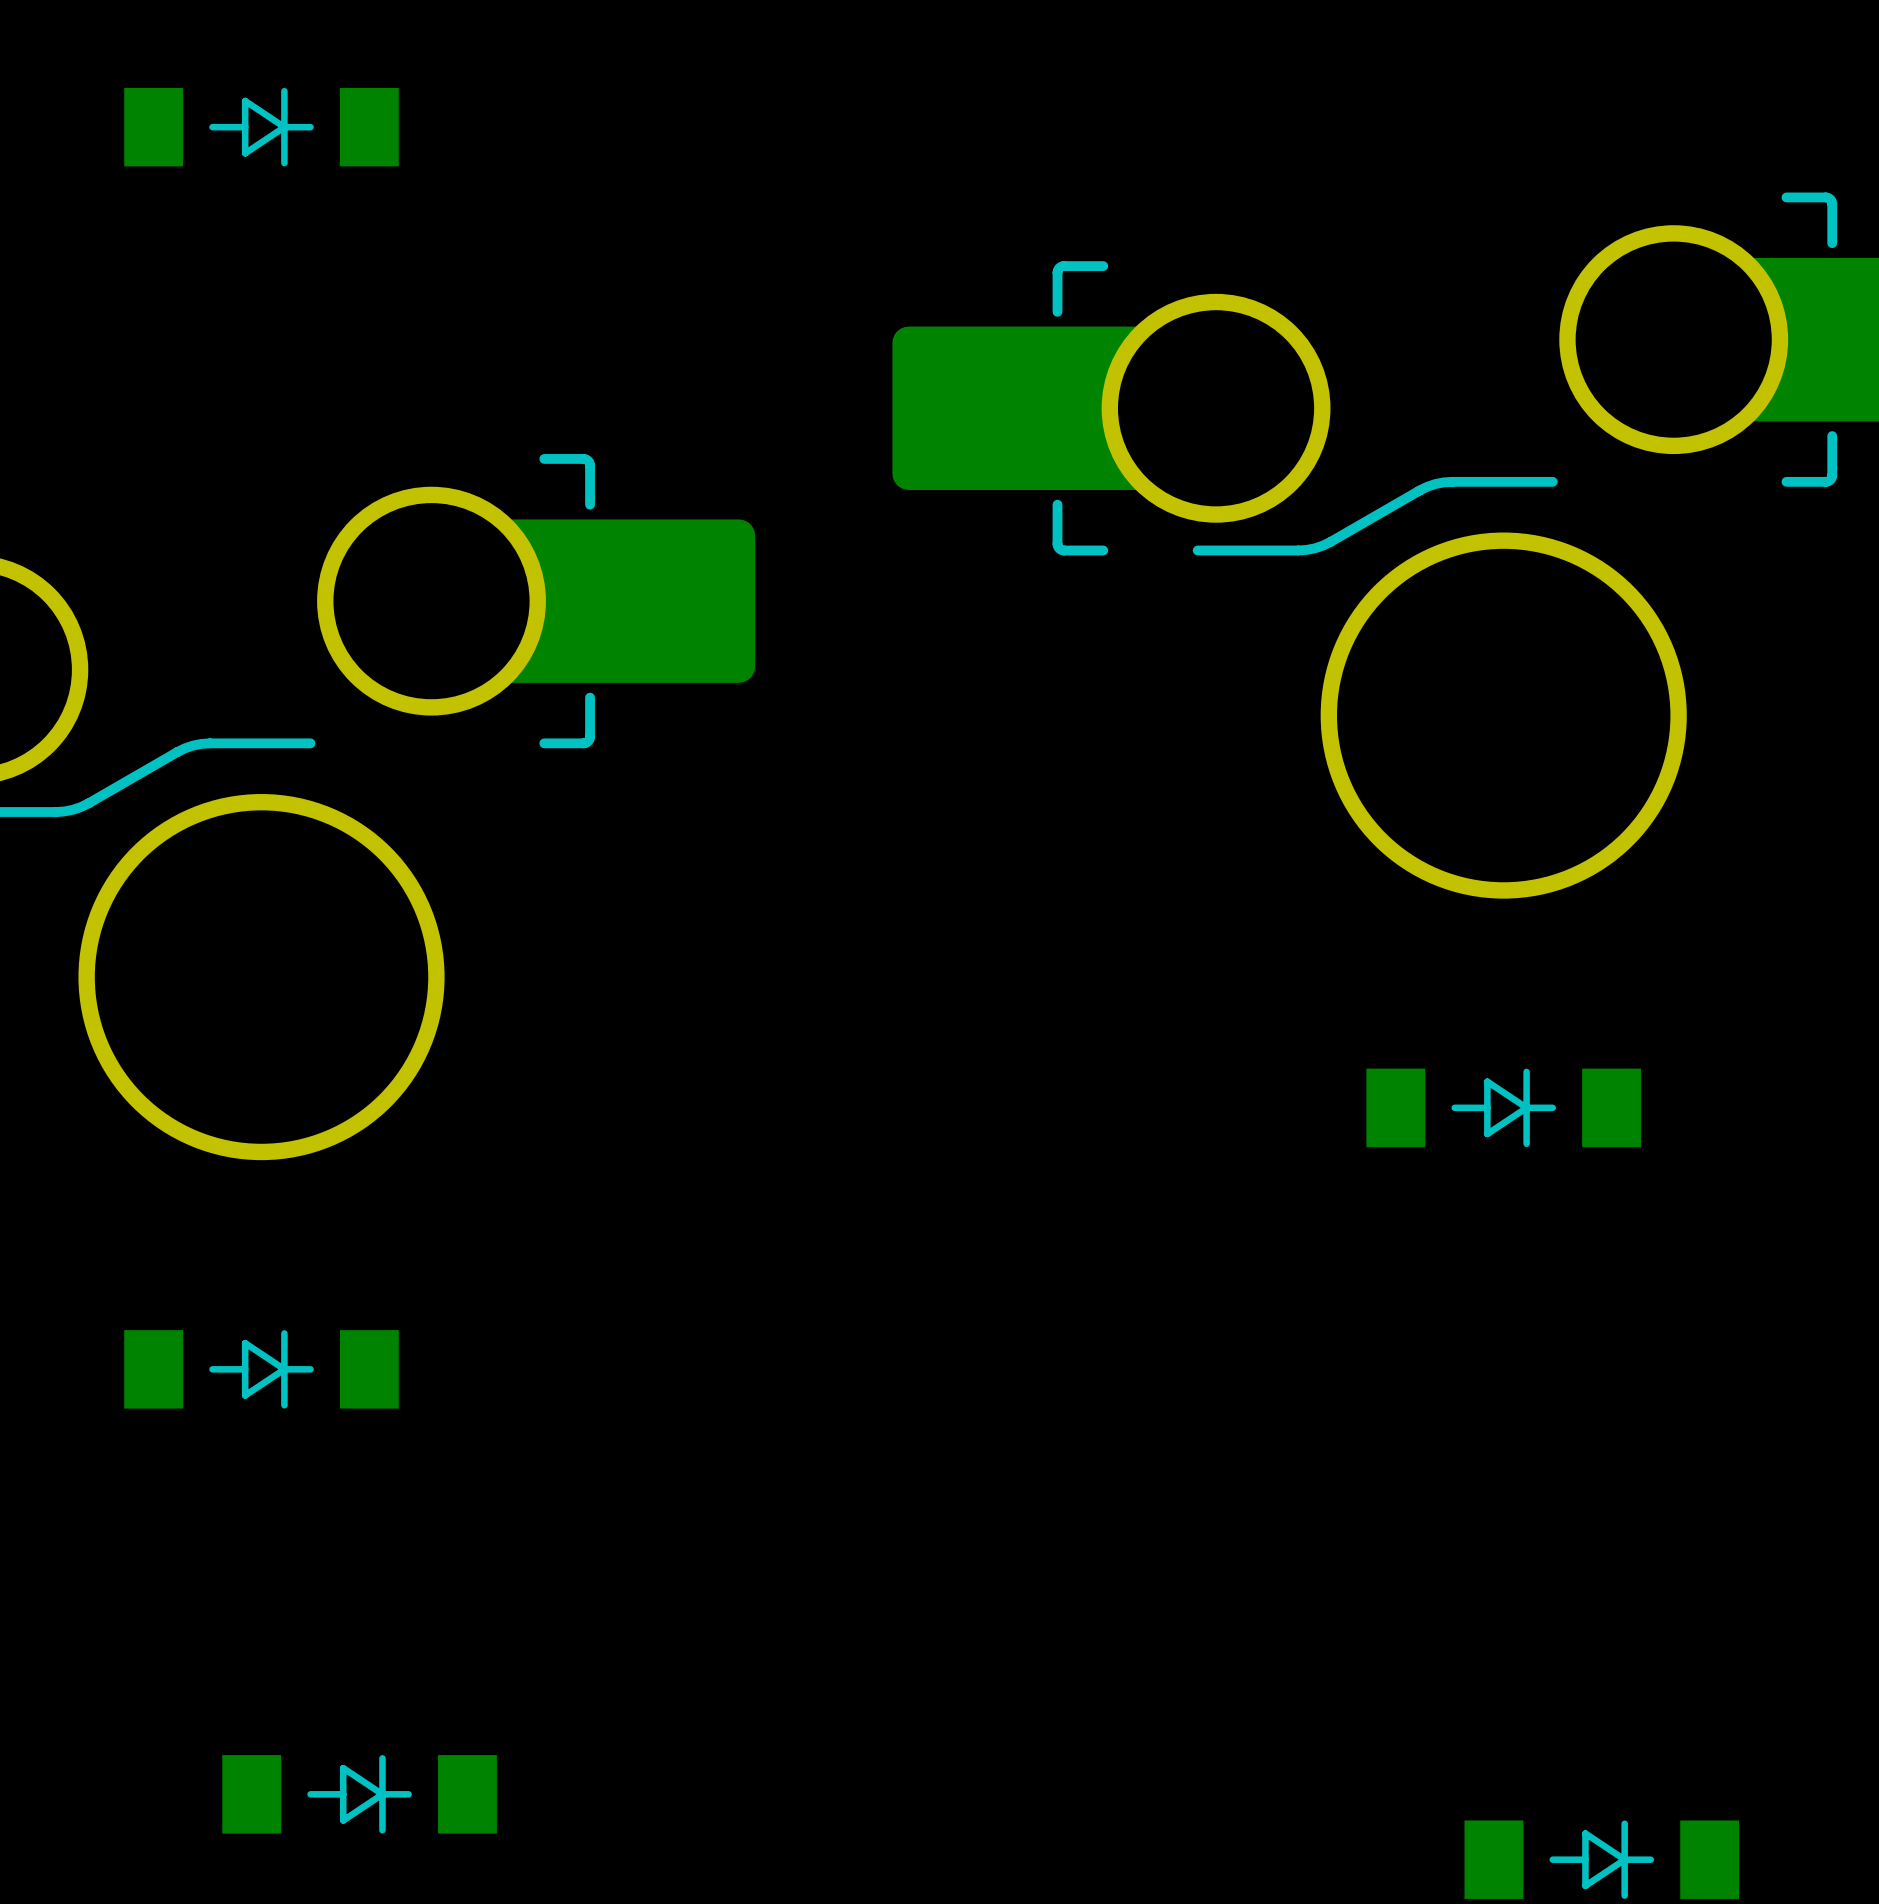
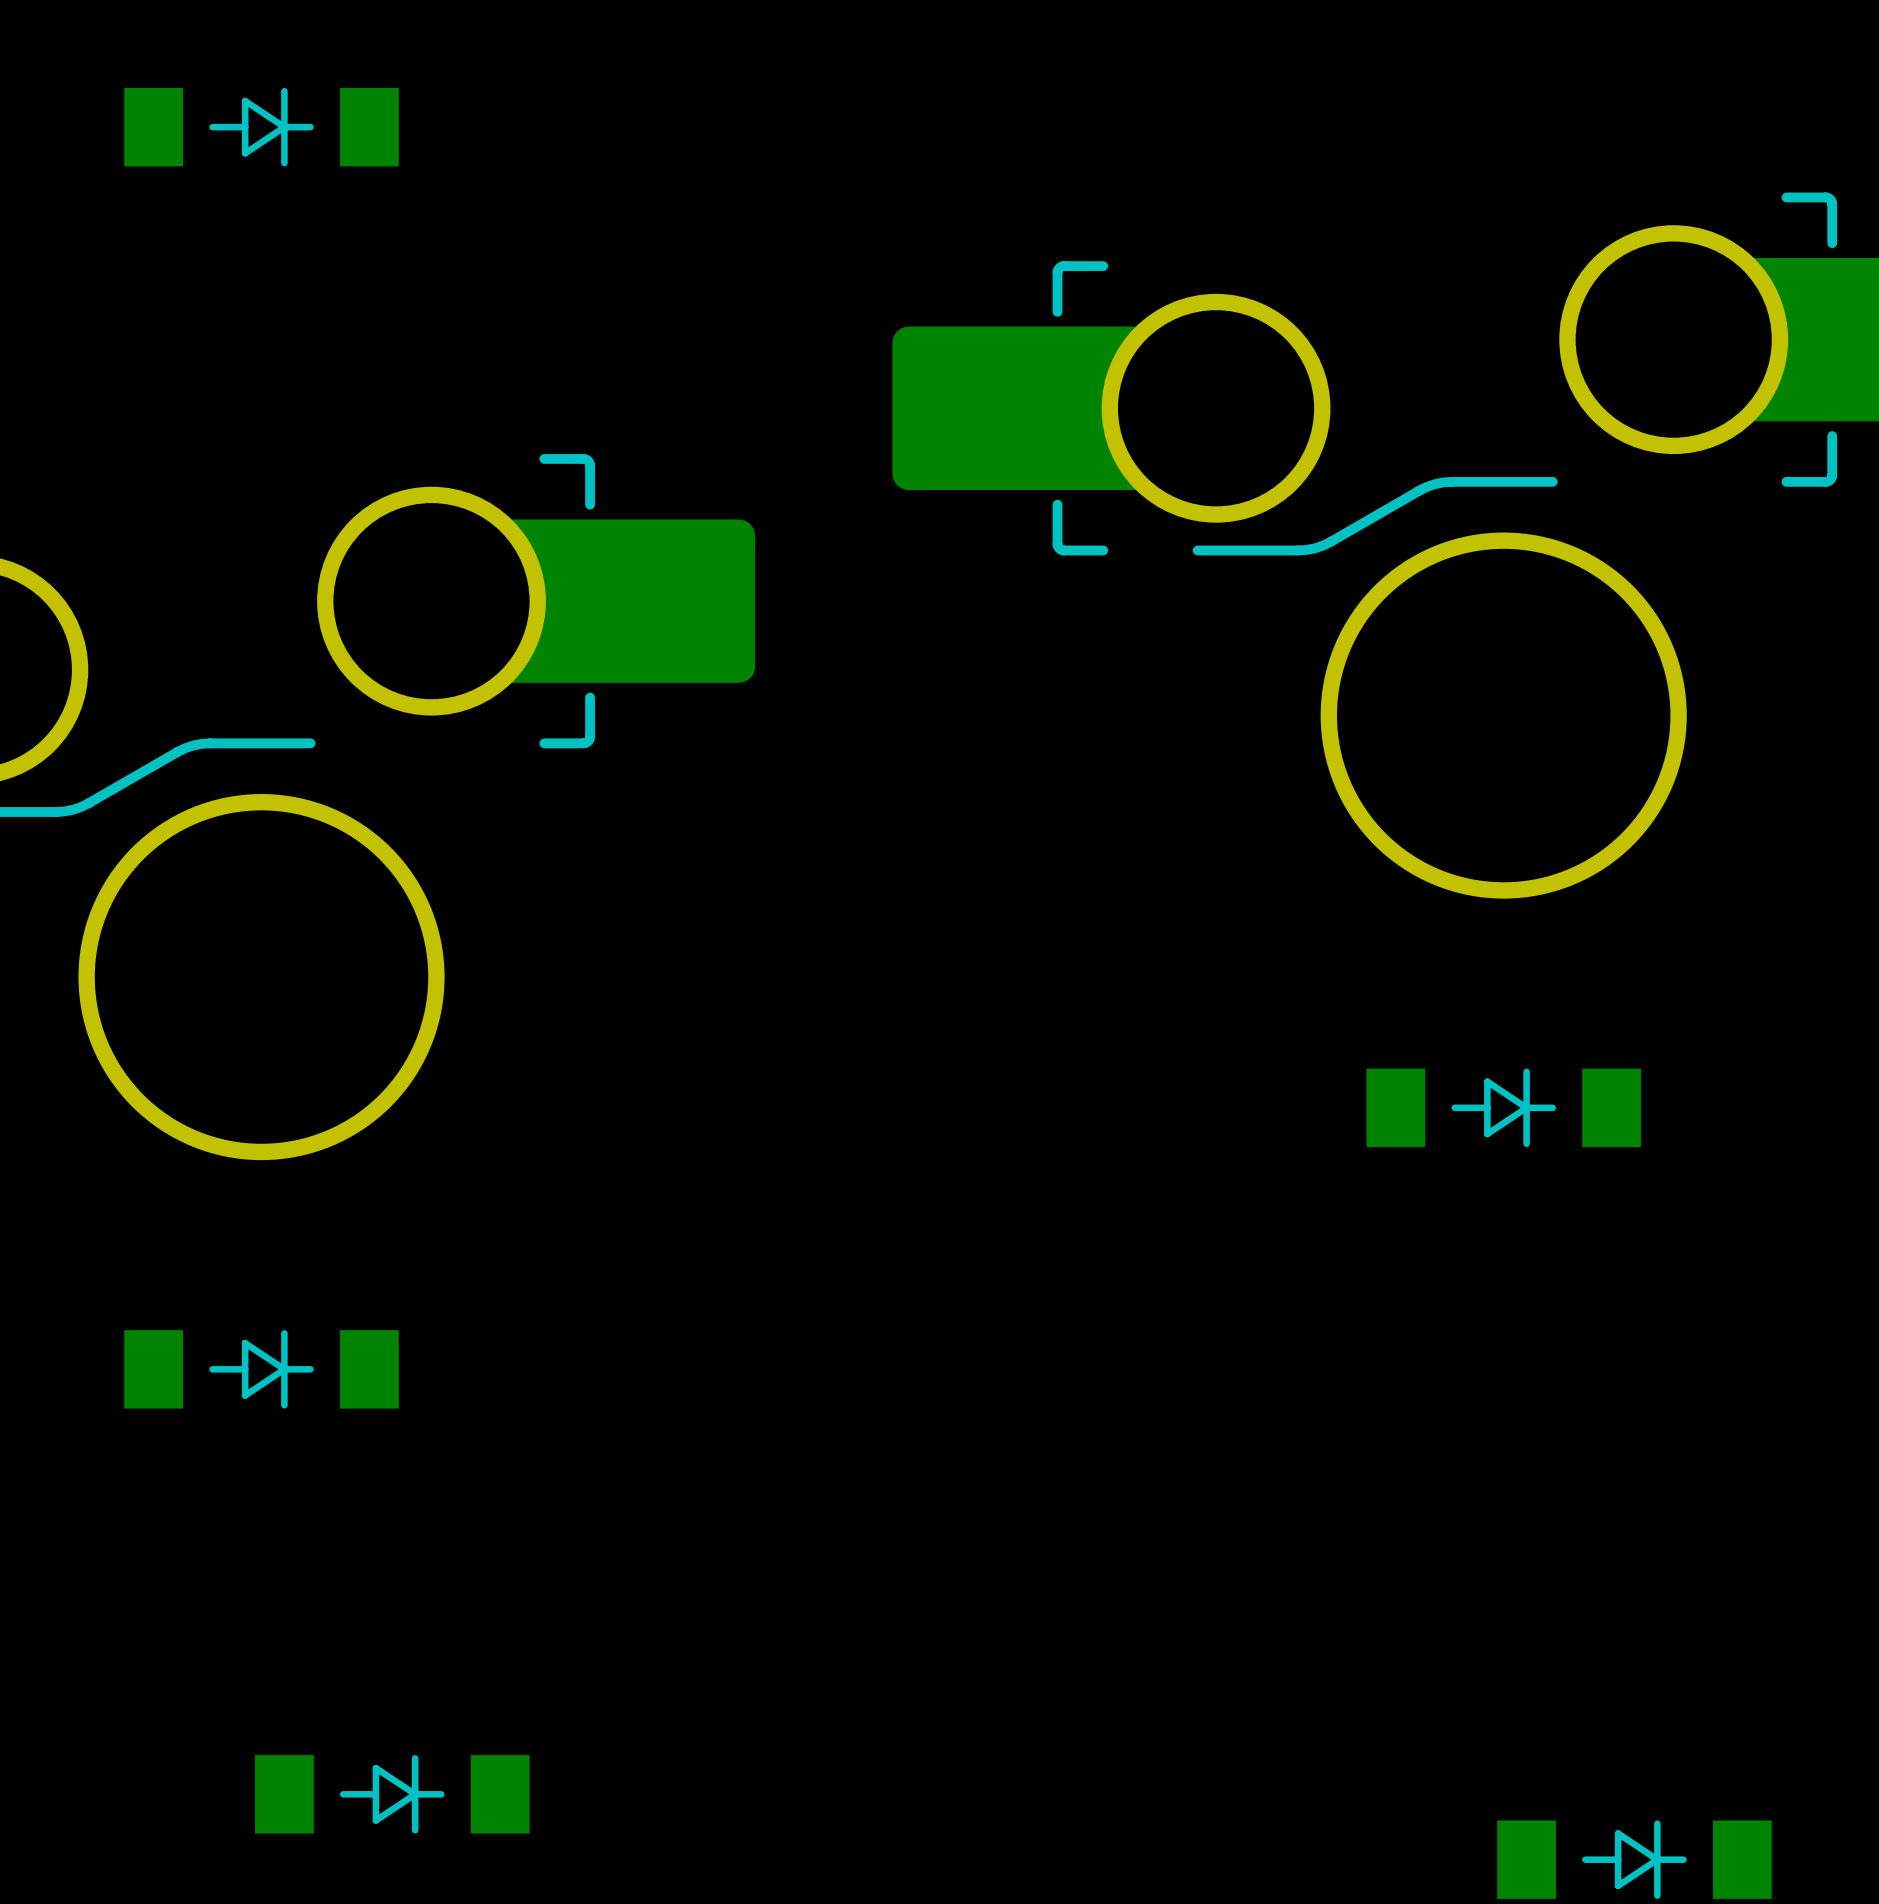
part position: (359, 1794) -> (392, 1794)
part position: (1601, 1859) -> (1634, 1859)

